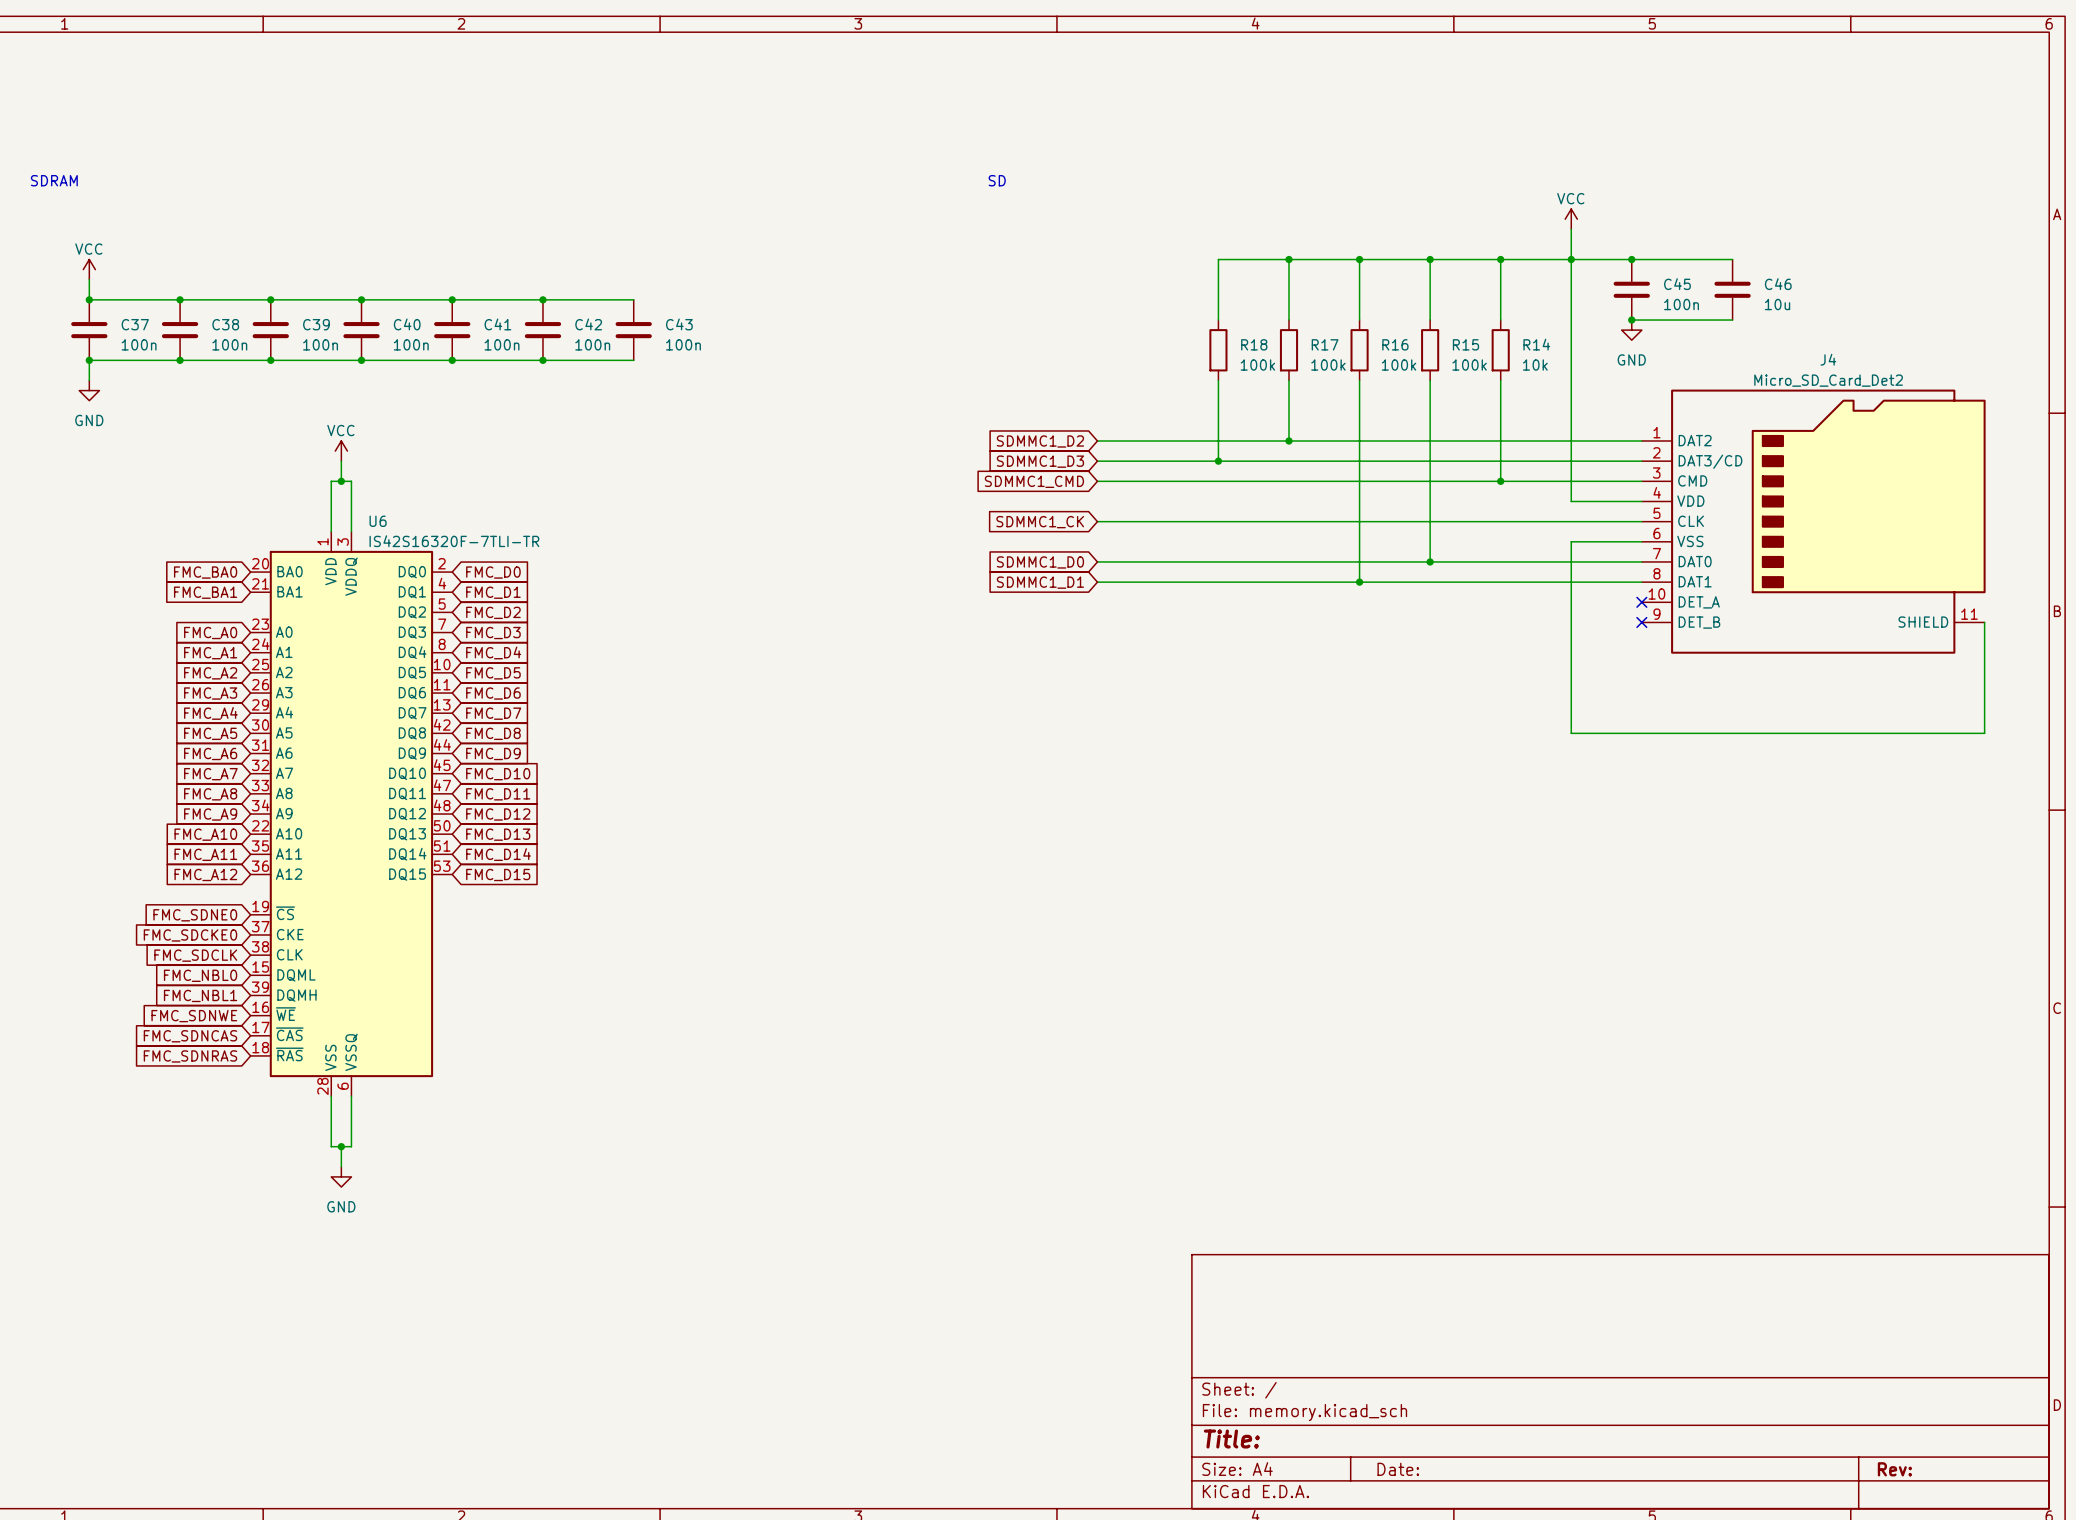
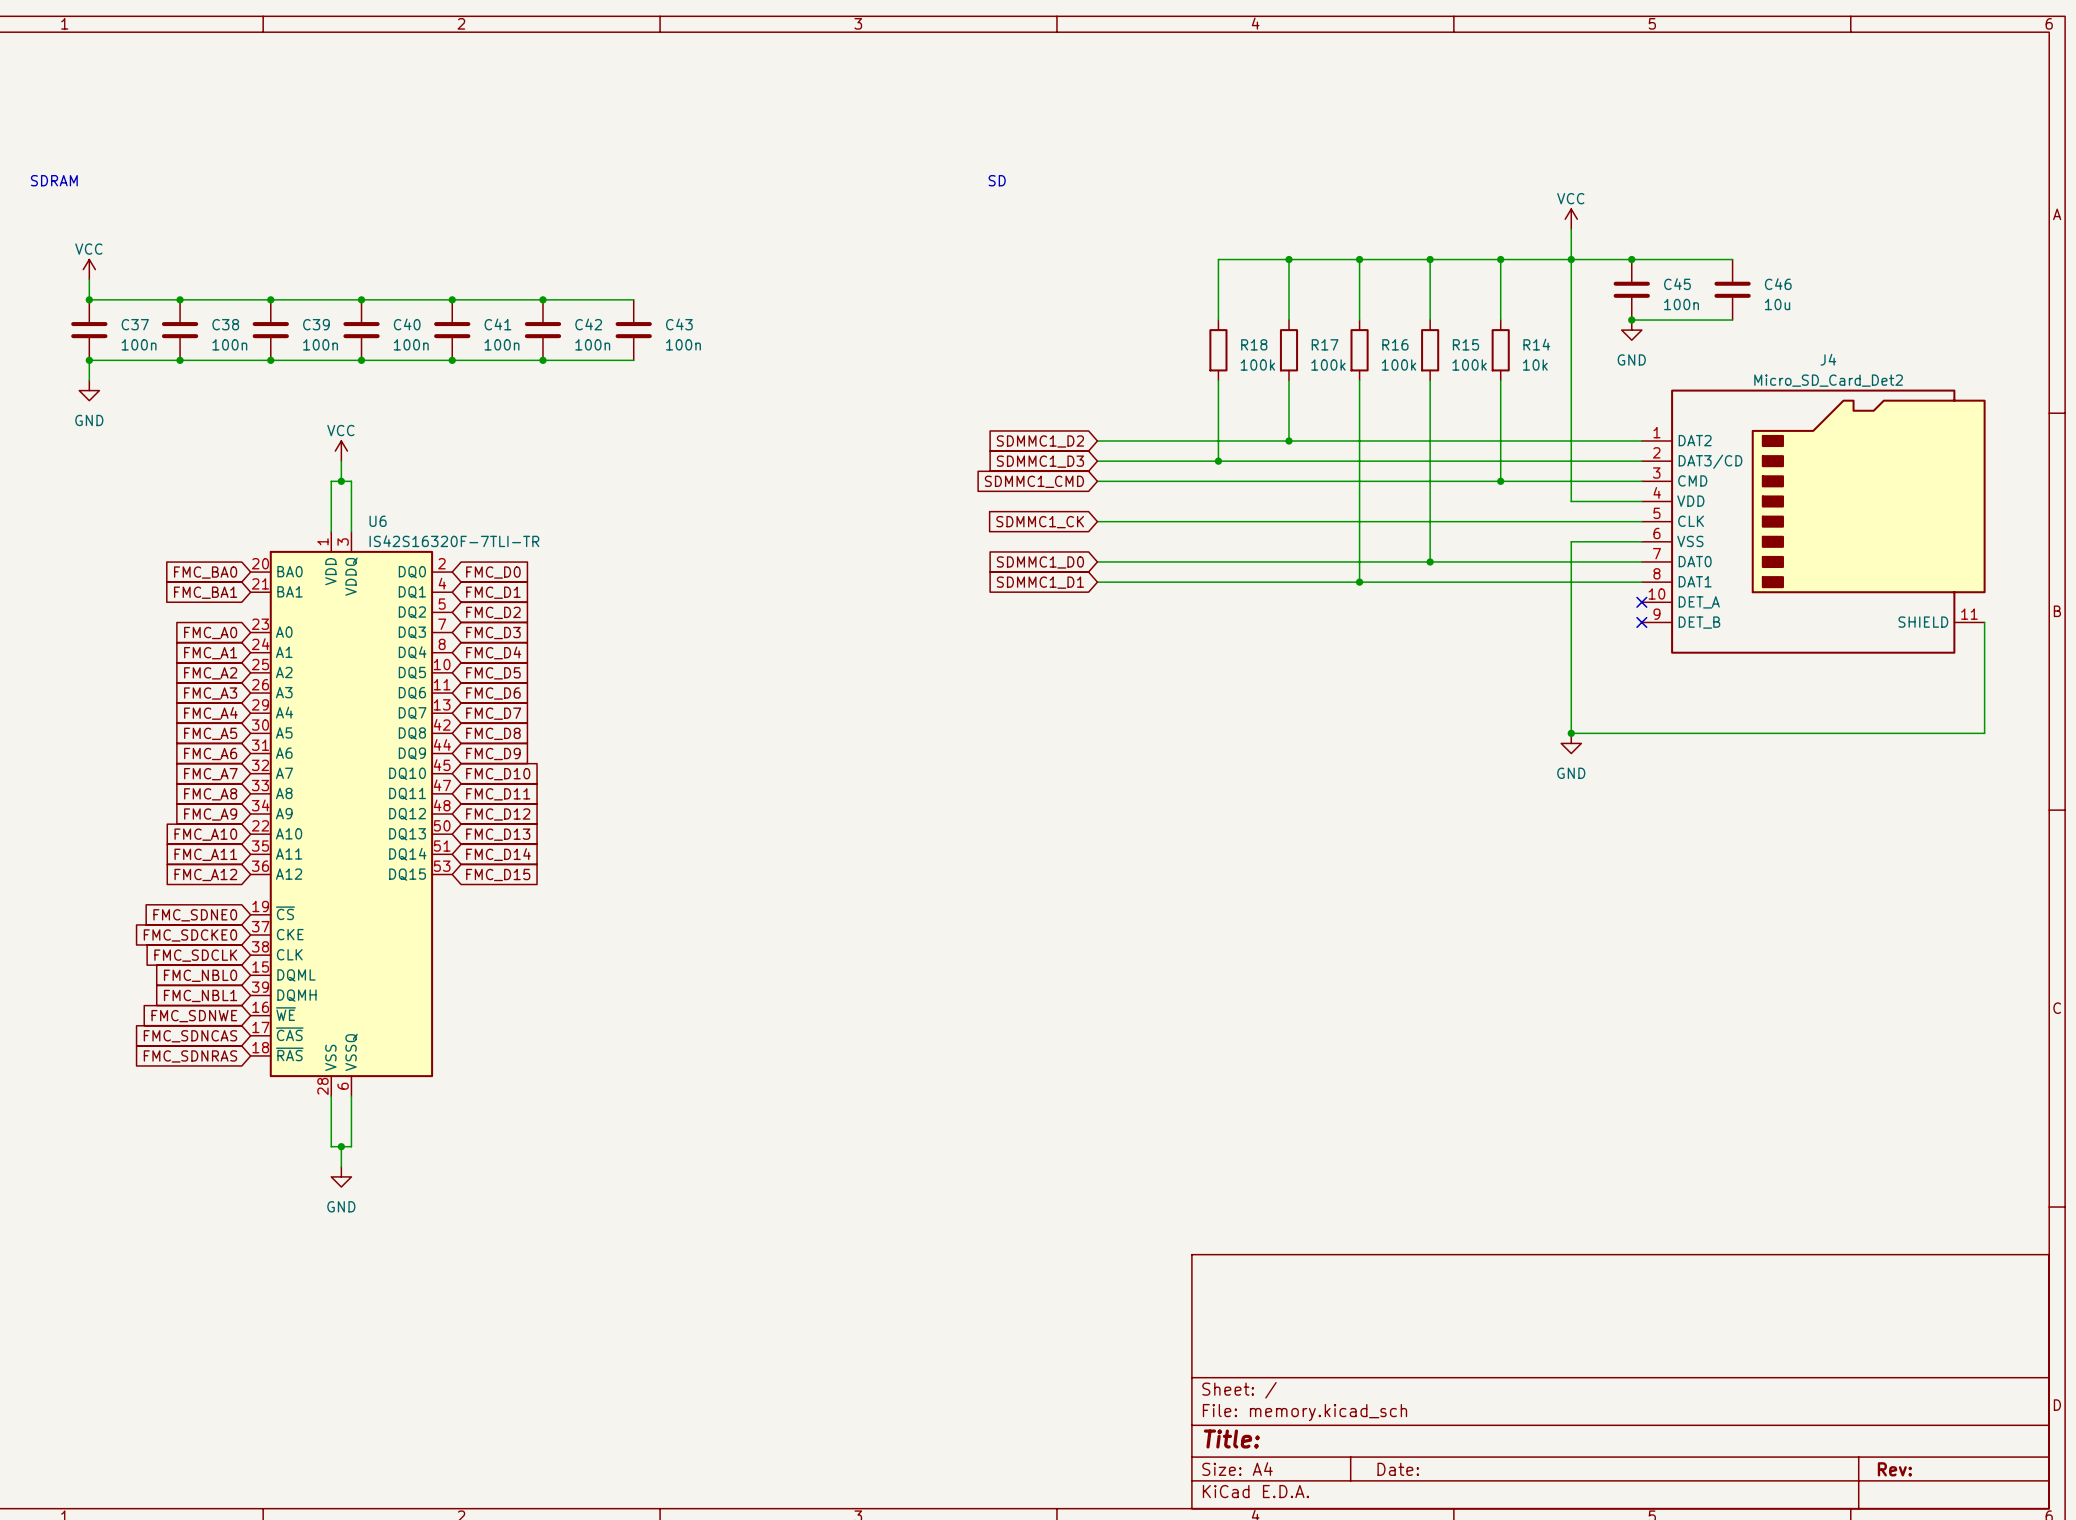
junction: none -> (1571, 733)
power symbol: none -> GND (1571, 743)

